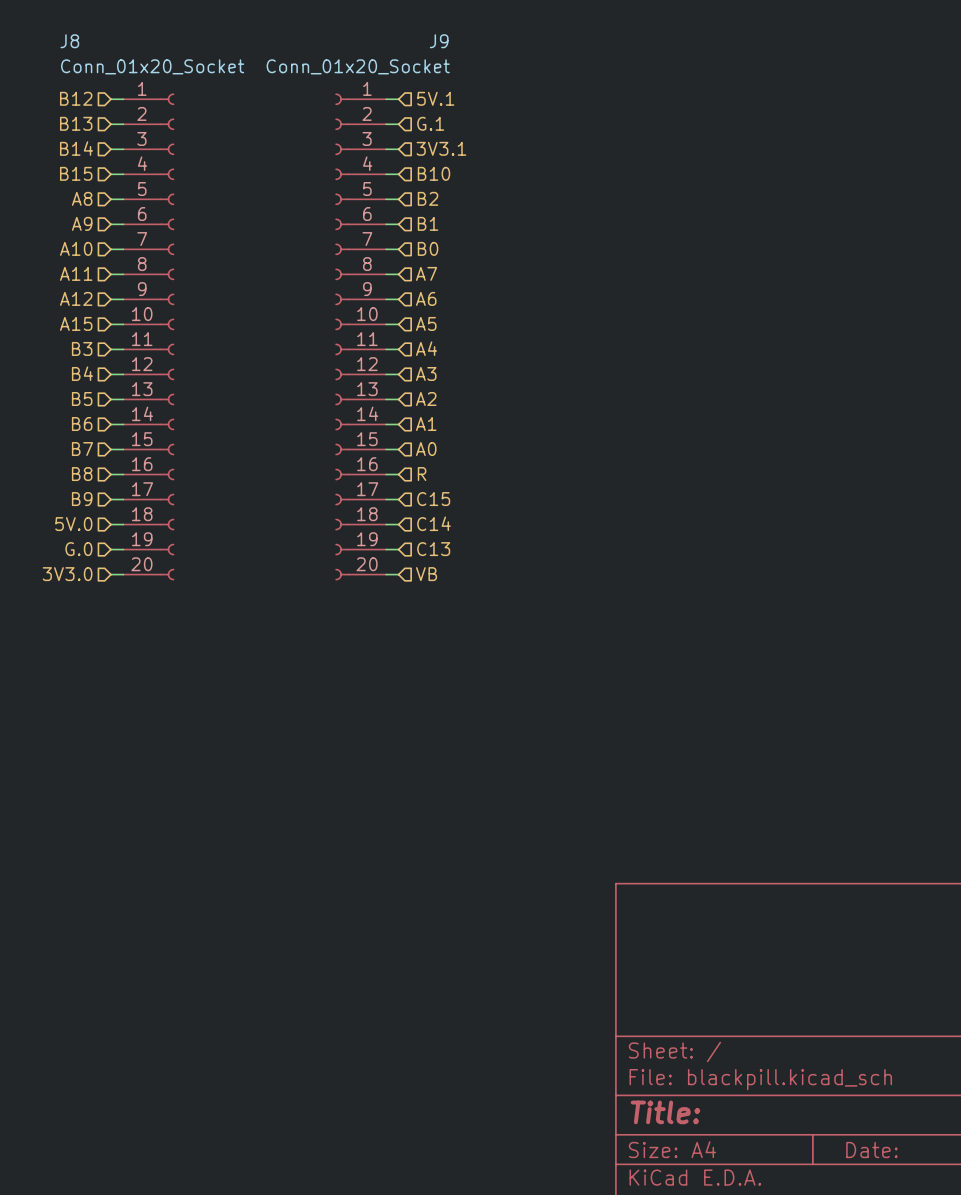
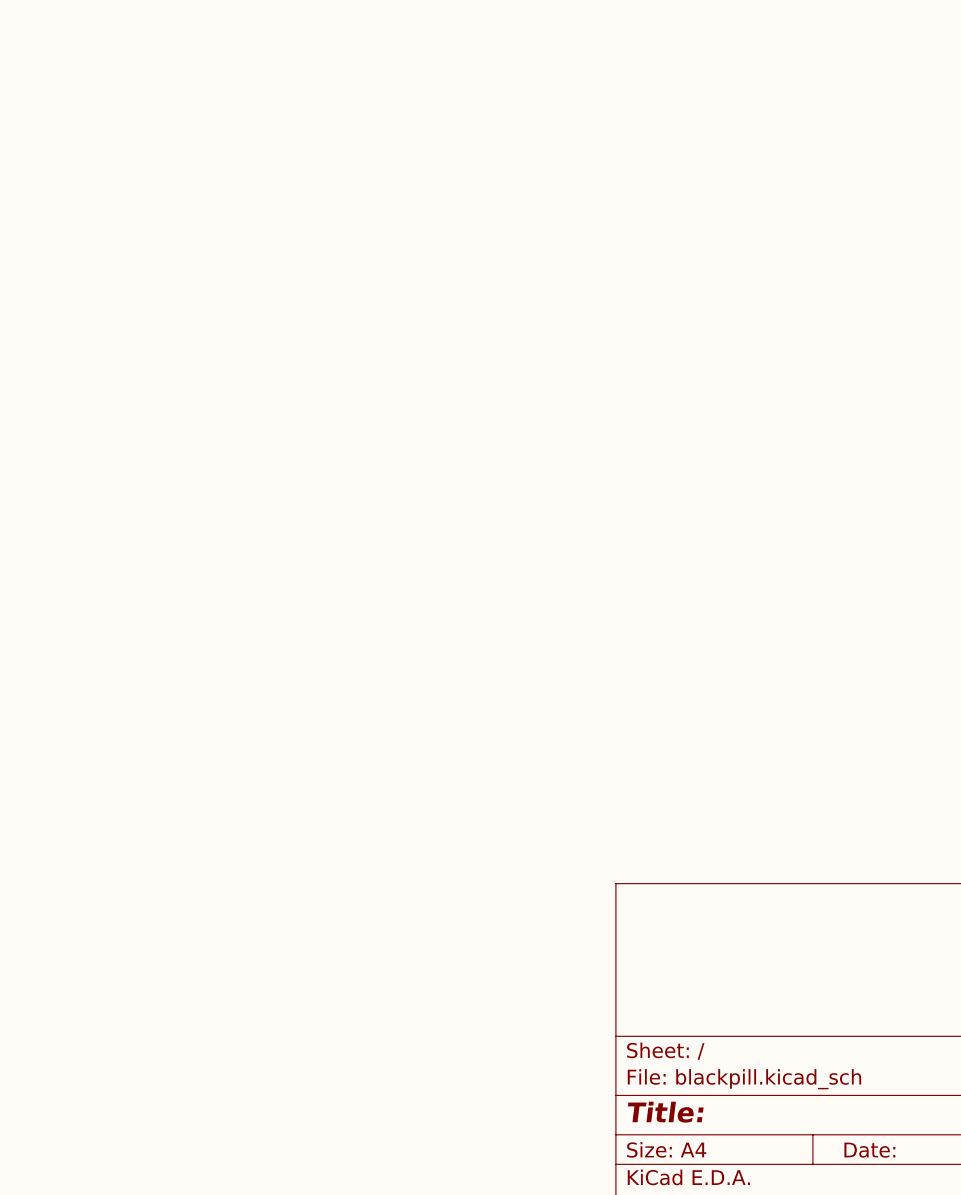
hierarchical label: B12 (76, 98) -> none
hierarchical label: 5V.1 (435, 98) -> none
wire: (110, 99) (123, 99) -> none
wire: (386, 99) (398, 99) -> none
hierarchical label: B13 (76, 123) -> none
hierarchical label: G.1 (430, 123) -> none
wire: (110, 124) (123, 124) -> none
wire: (386, 124) (398, 124) -> none
hierarchical label: B14 (76, 148) -> none
hierarchical label: 3V3.1 (441, 148) -> none
wire: (110, 149) (123, 149) -> none
wire: (386, 149) (398, 149) -> none
hierarchical label: B15 (76, 173) -> none
hierarchical label: B10 (433, 173) -> none
wire: (110, 174) (123, 174) -> none
wire: (386, 174) (398, 174) -> none
hierarchical label: A8 (82, 198) -> none
hierarchical label: B2 (428, 198) -> none
wire: (110, 199) (123, 199) -> none
wire: (386, 199) (398, 199) -> none
hierarchical label: A9 (82, 223) -> none
hierarchical label: B1 (428, 223) -> none
wire: (110, 224) (123, 224) -> none
wire: (386, 224) (398, 224) -> none
hierarchical label: A10 (76, 248) -> none
hierarchical label: B0 (428, 248) -> none
wire: (110, 249) (123, 249) -> none
wire: (386, 249) (398, 249) -> none
hierarchical label: A11 (76, 273) -> none
hierarchical label: A7 (426, 273) -> none
wire: (110, 274) (123, 274) -> none
wire: (386, 274) (398, 274) -> none
hierarchical label: A12 (76, 298) -> none
hierarchical label: A6 (426, 298) -> none
wire: (110, 299) (123, 299) -> none
wire: (386, 299) (398, 299) -> none
hierarchical label: A15 (76, 323) -> none
hierarchical label: A5 (426, 323) -> none
wire: (110, 324) (123, 324) -> none
wire: (386, 324) (398, 324) -> none
J8: Conn_01x20_Socket (148, 336) -> none
J9: Conn_01x20_Socket (360, 336) -> none
hierarchical label: B3 (82, 348) -> none
hierarchical label: A4 (426, 348) -> none
wire: (110, 349) (123, 349) -> none
wire: (386, 349) (398, 349) -> none
hierarchical label: B4 (82, 373) -> none
hierarchical label: A3 (426, 373) -> none
wire: (110, 374) (123, 374) -> none
wire: (386, 374) (398, 374) -> none
hierarchical label: B5 (82, 398) -> none
hierarchical label: A2 (426, 398) -> none
wire: (110, 399) (123, 399) -> none
wire: (386, 399) (398, 399) -> none
hierarchical label: B6 (82, 424) -> none
wire: (110, 424) (123, 424) -> none
wire: (386, 424) (398, 424) -> none
hierarchical label: A1 (426, 424) -> none
hierarchical label: B7 (82, 449) -> none
wire: (110, 449) (123, 449) -> none
wire: (386, 449) (398, 449) -> none
hierarchical label: A0 (426, 449) -> none
hierarchical label: B8 (82, 474) -> none
wire: (110, 474) (123, 474) -> none
wire: (386, 474) (398, 474) -> none
hierarchical label: R (422, 474) -> none
hierarchical label: B9 (82, 499) -> none
wire: (110, 499) (123, 499) -> none
wire: (386, 499) (398, 499) -> none
hierarchical label: C15 (433, 499) -> none
hierarchical label: C14 (433, 523) -> none
hierarchical label: 5V.0 (73, 524) -> none
wire: (110, 524) (123, 524) -> none
wire: (386, 524) (398, 524) -> none
hierarchical label: G.0 (78, 549) -> none
wire: (110, 549) (123, 549) -> none
wire: (386, 549) (398, 549) -> none
hierarchical label: C13 (433, 549) -> none
hierarchical label: 3V3.0 (67, 574) -> none
wire: (110, 574) (123, 574) -> none
wire: (386, 574) (398, 574) -> none
hierarchical label: VB (426, 574) -> none

